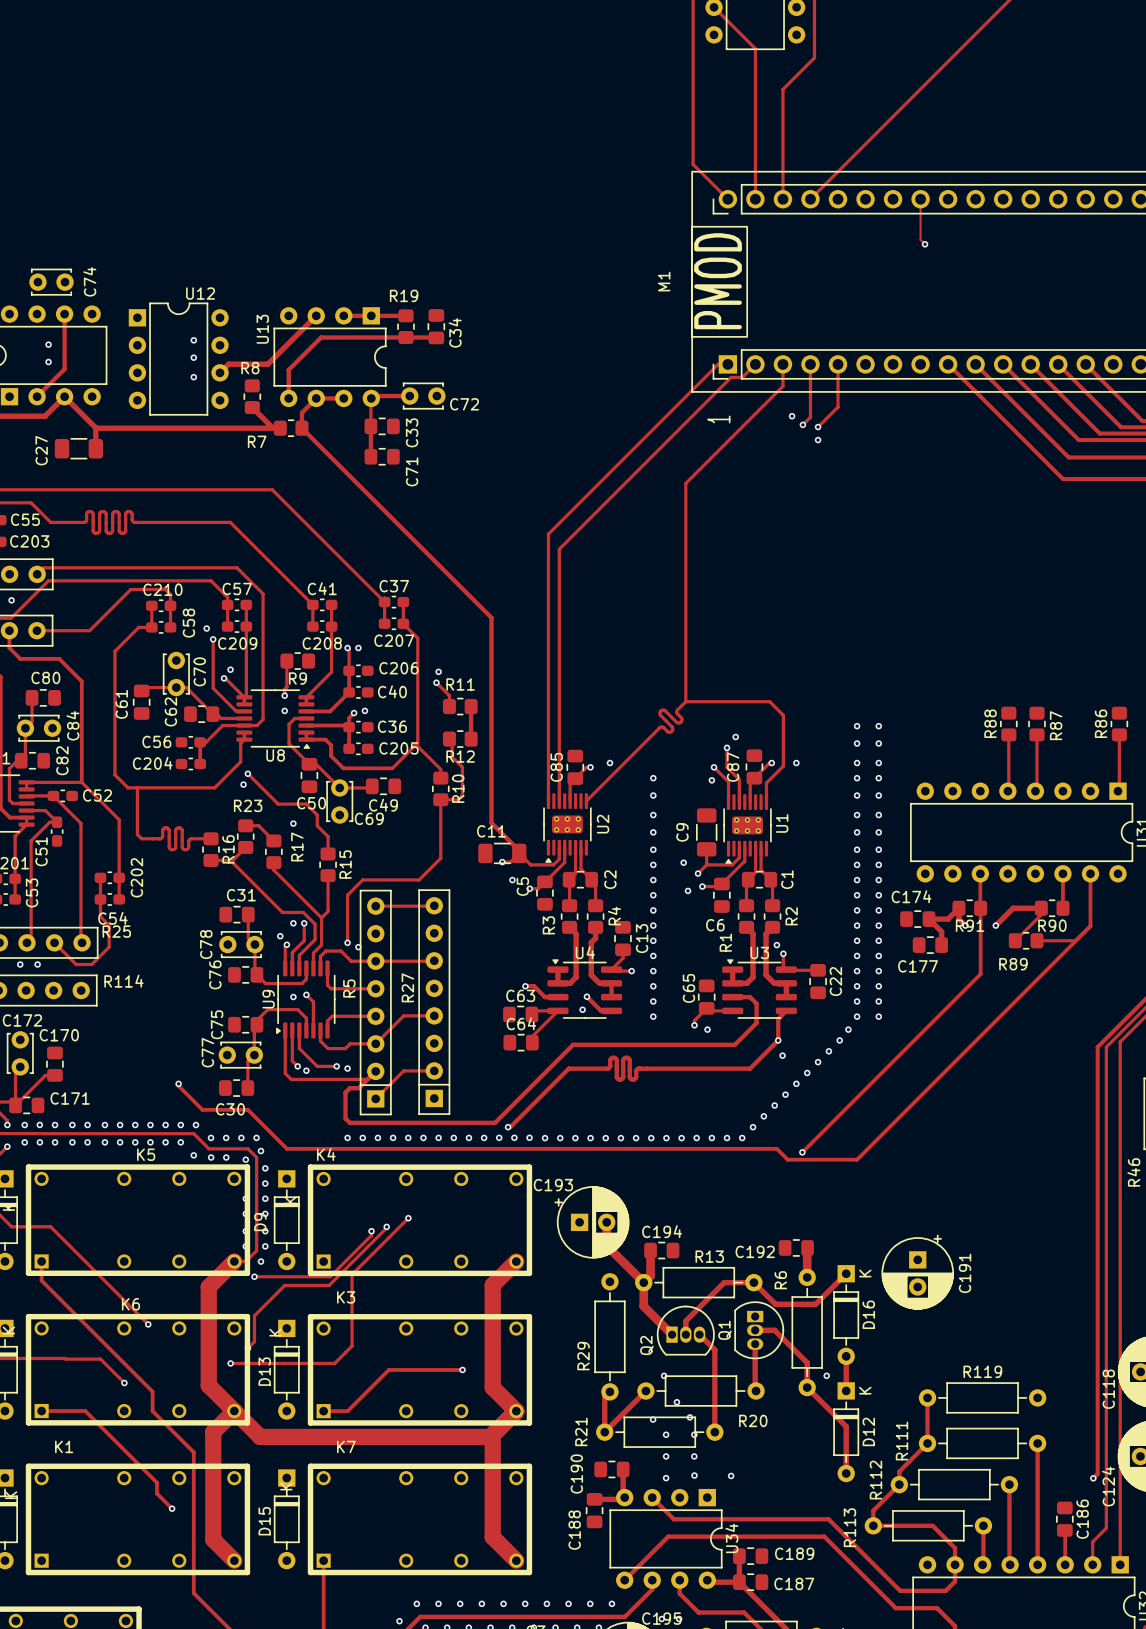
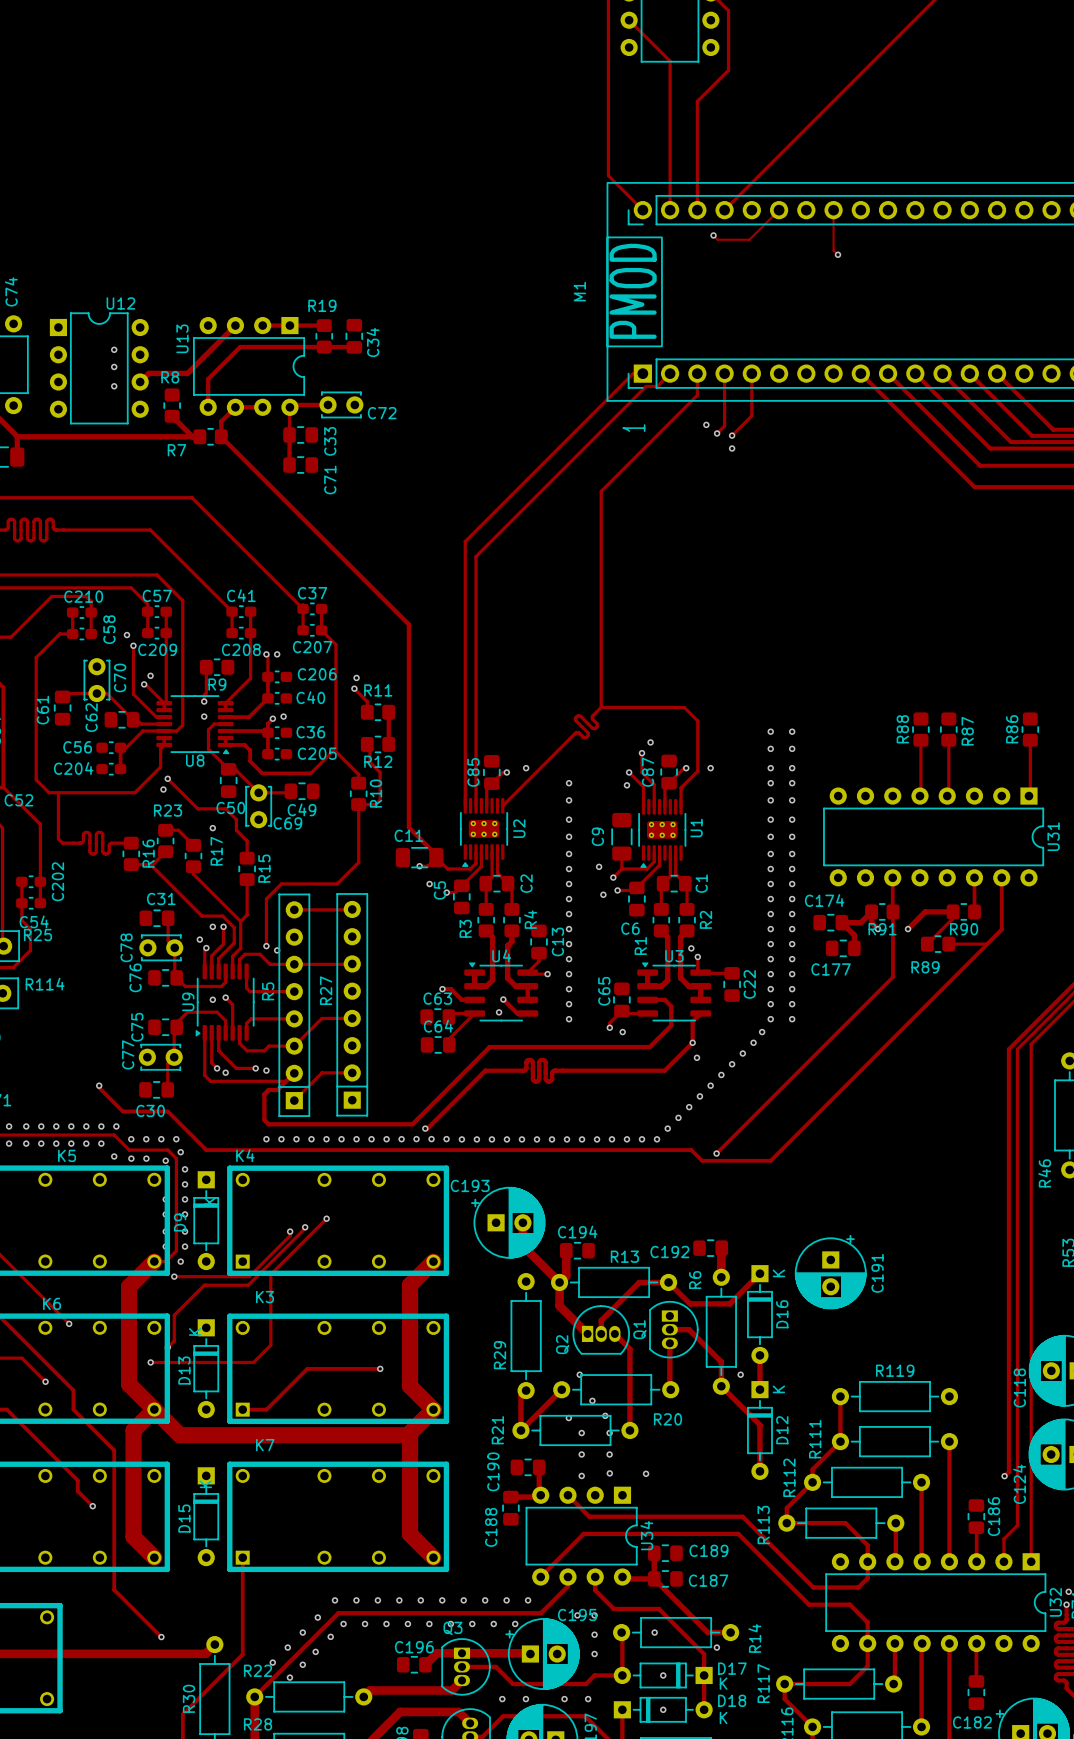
track: none -> (779, 210) (749, 239) (717, 239) (713, 235)
via: none -> (713, 235)

